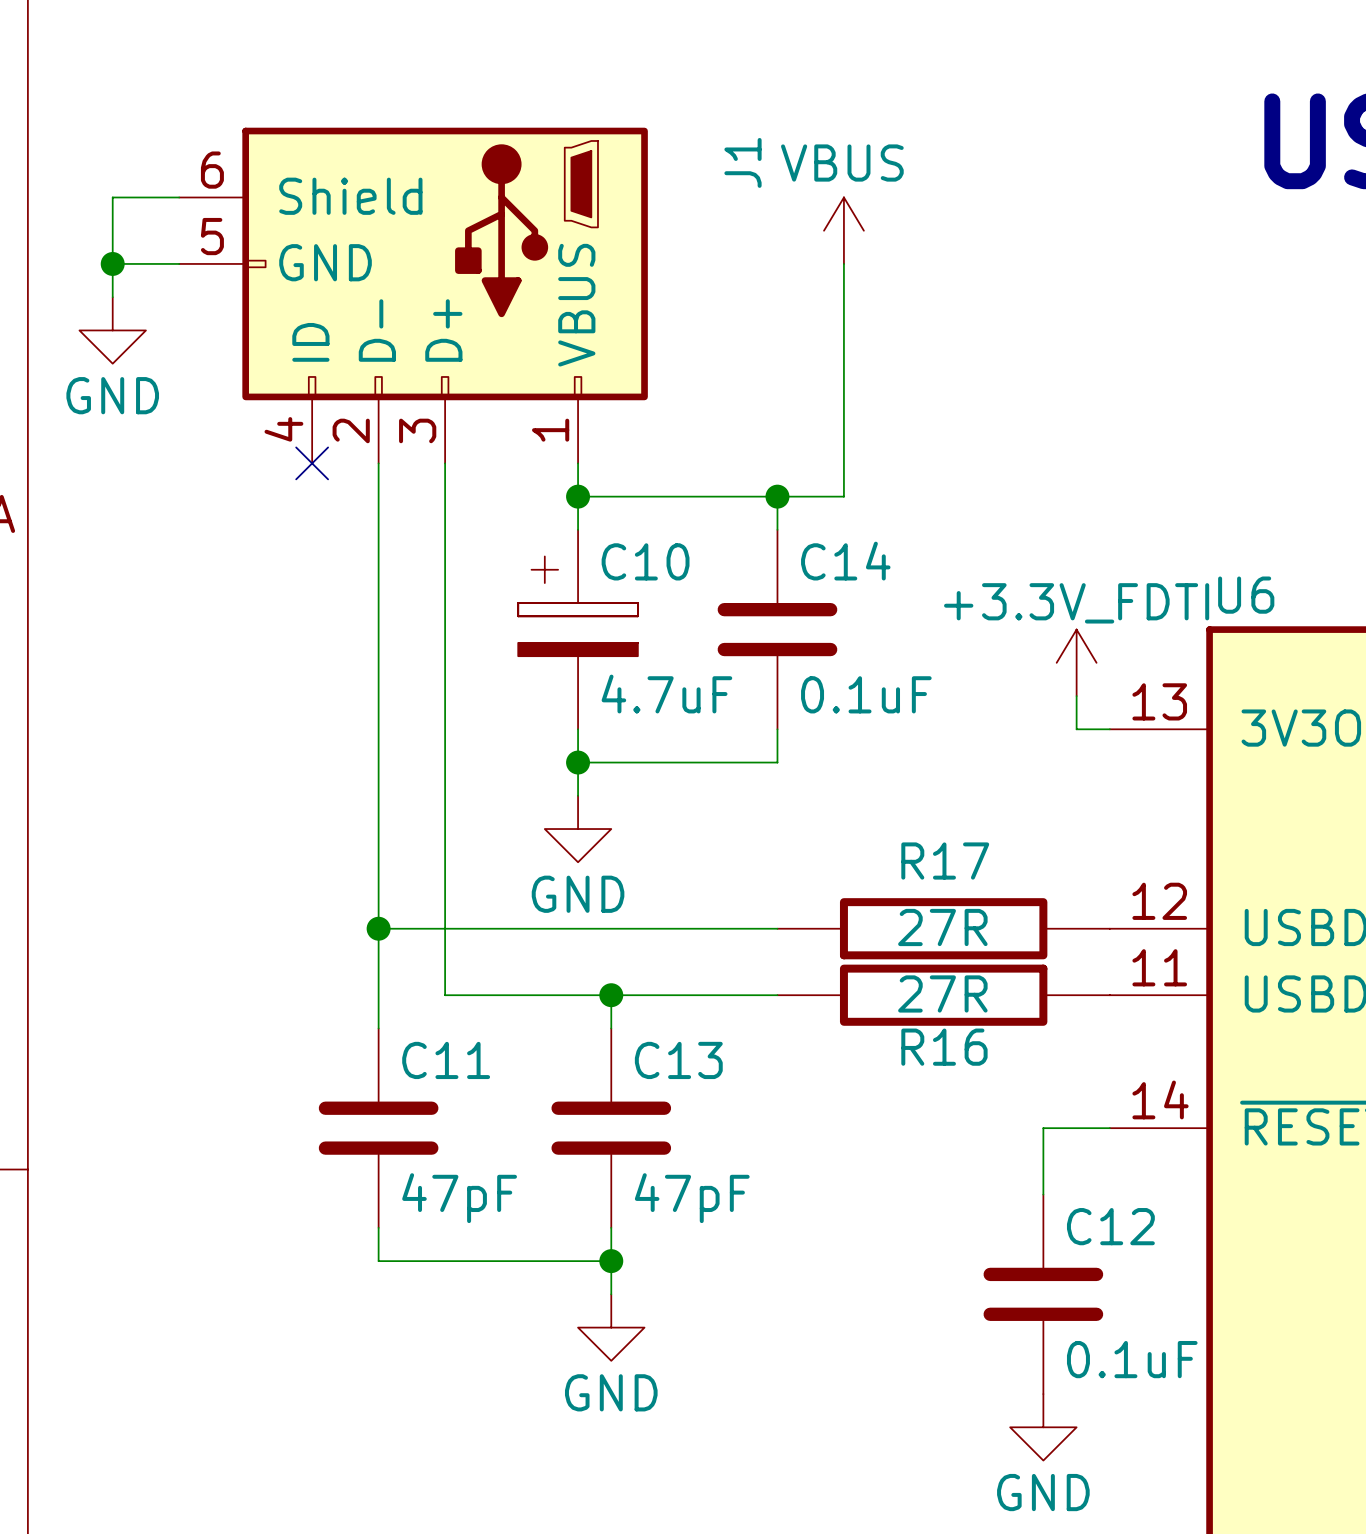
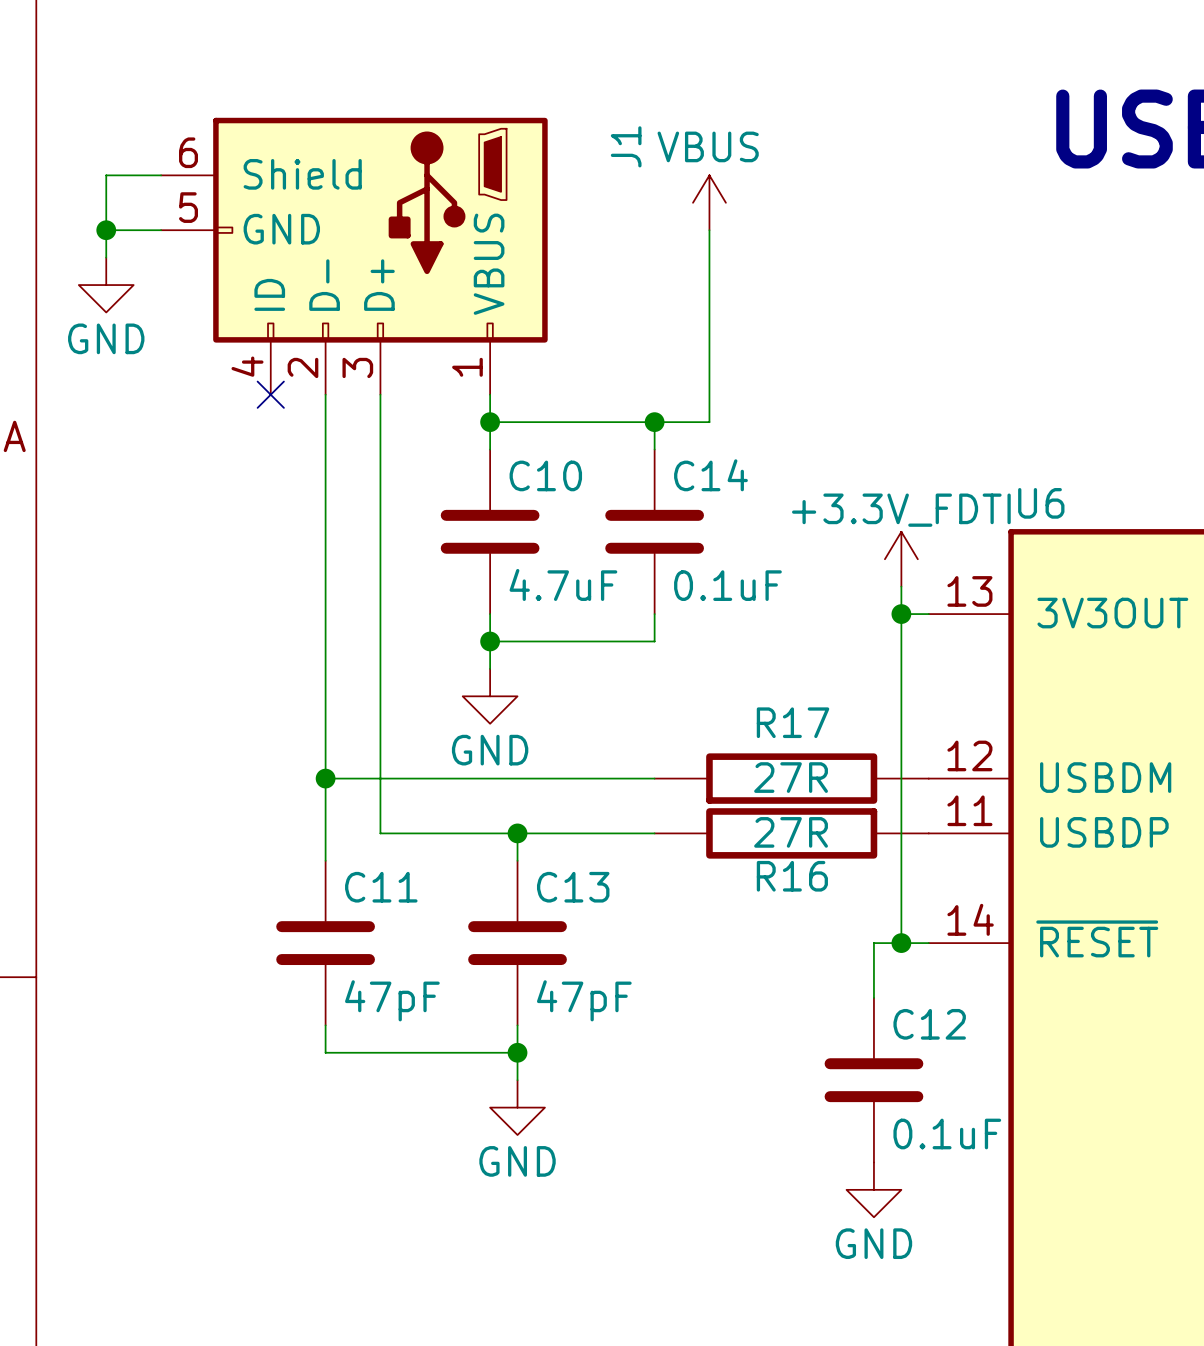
C10 symbol: [518, 529, 638, 730] -> [440, 449, 540, 615]
wire: none -> (901, 614) (901, 943)
junction: none -> (901, 614)
junction: none -> (901, 943)

